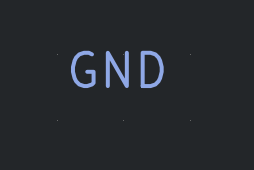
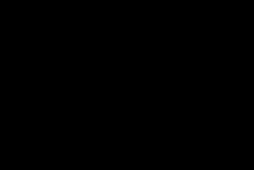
text: GND (117, 69) -> none

